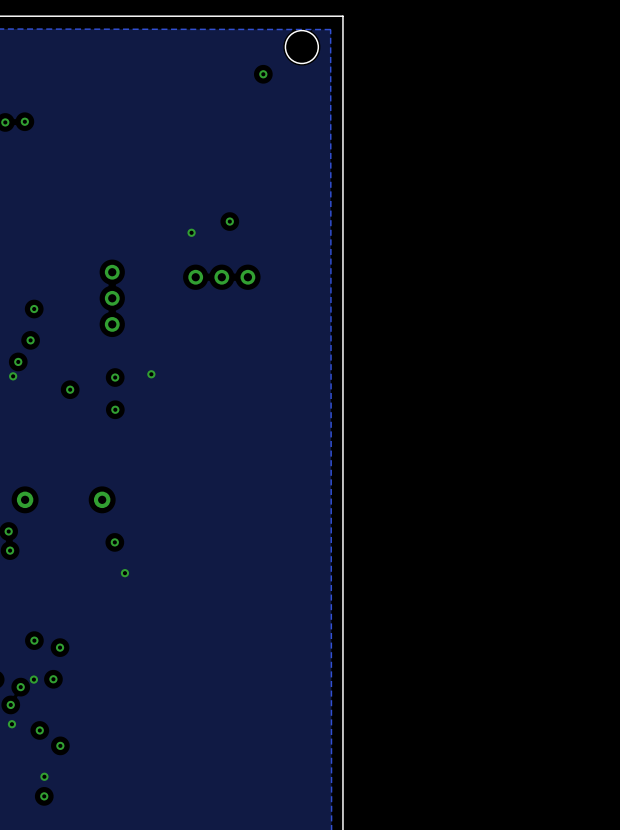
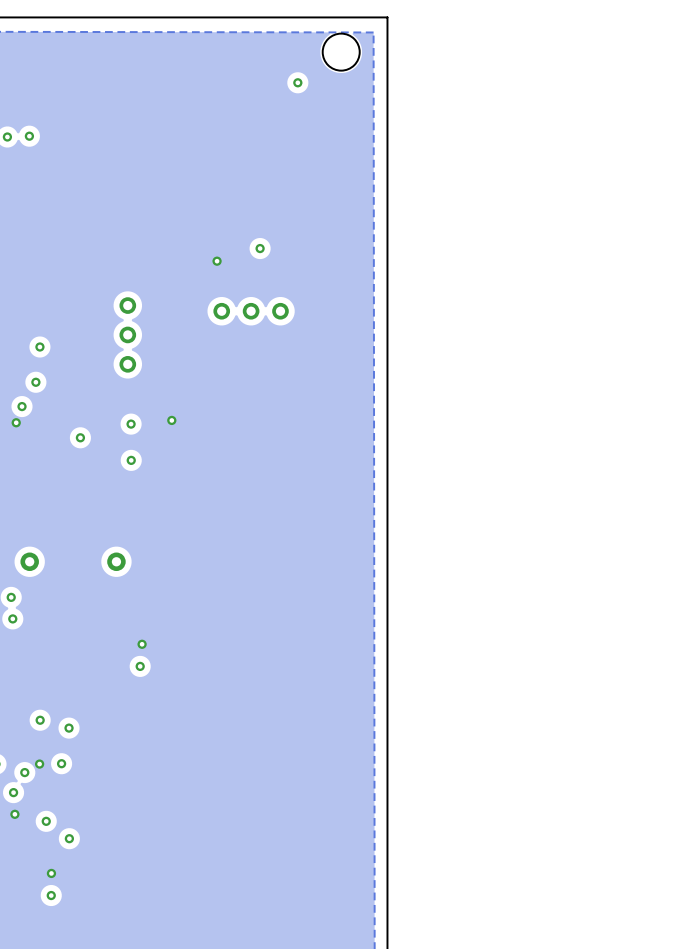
via position: (114, 542) -> (140, 666)

